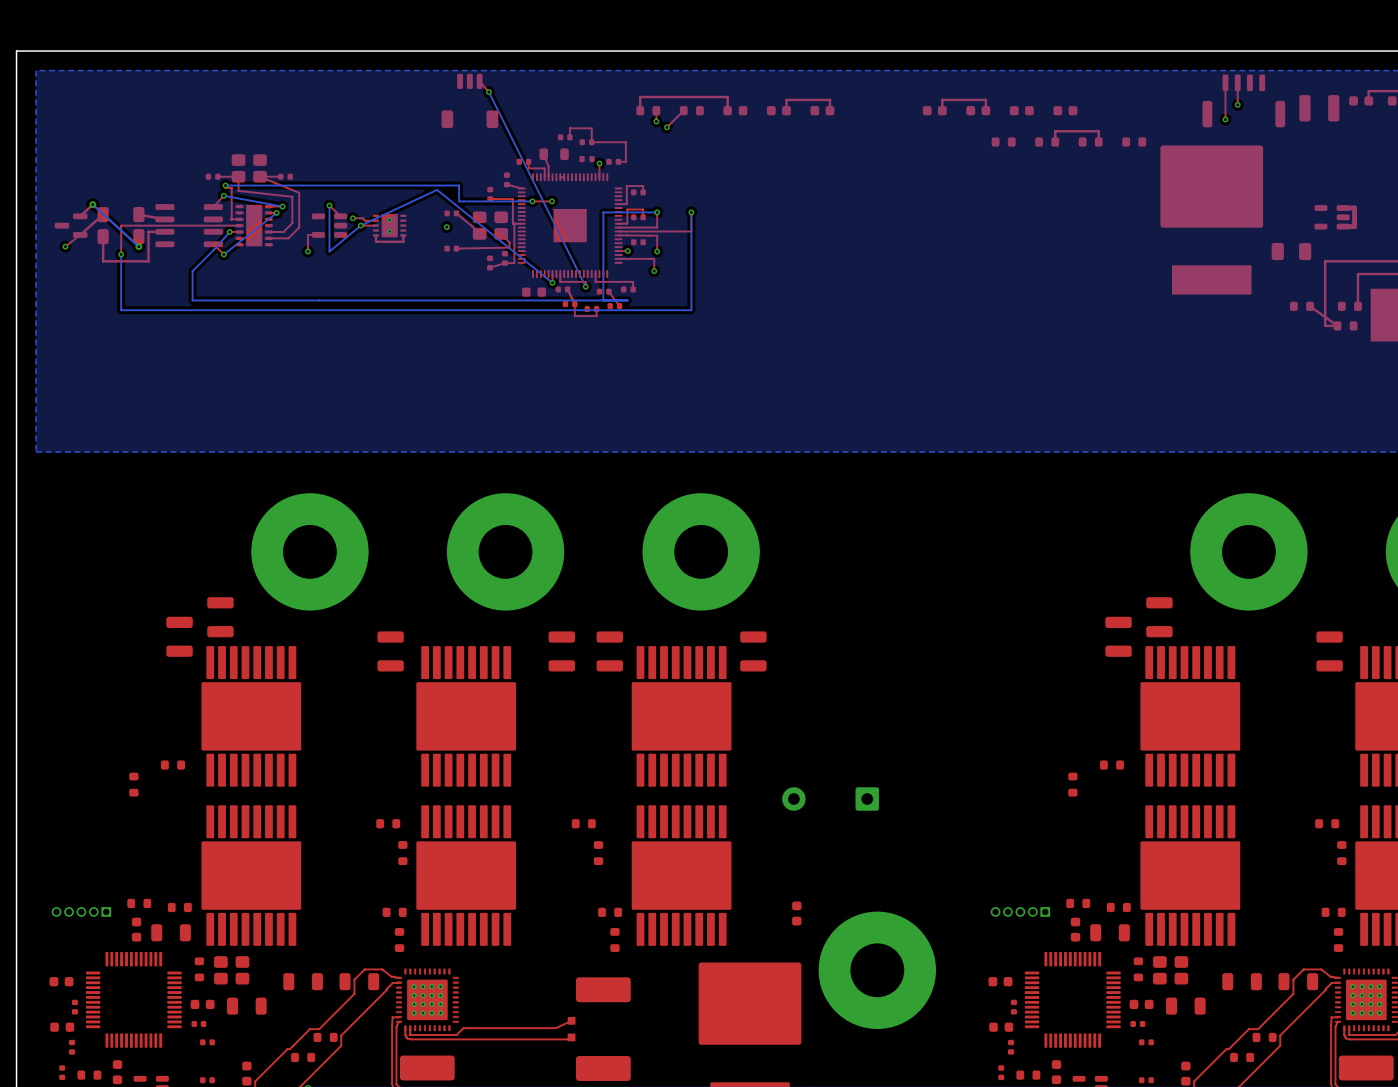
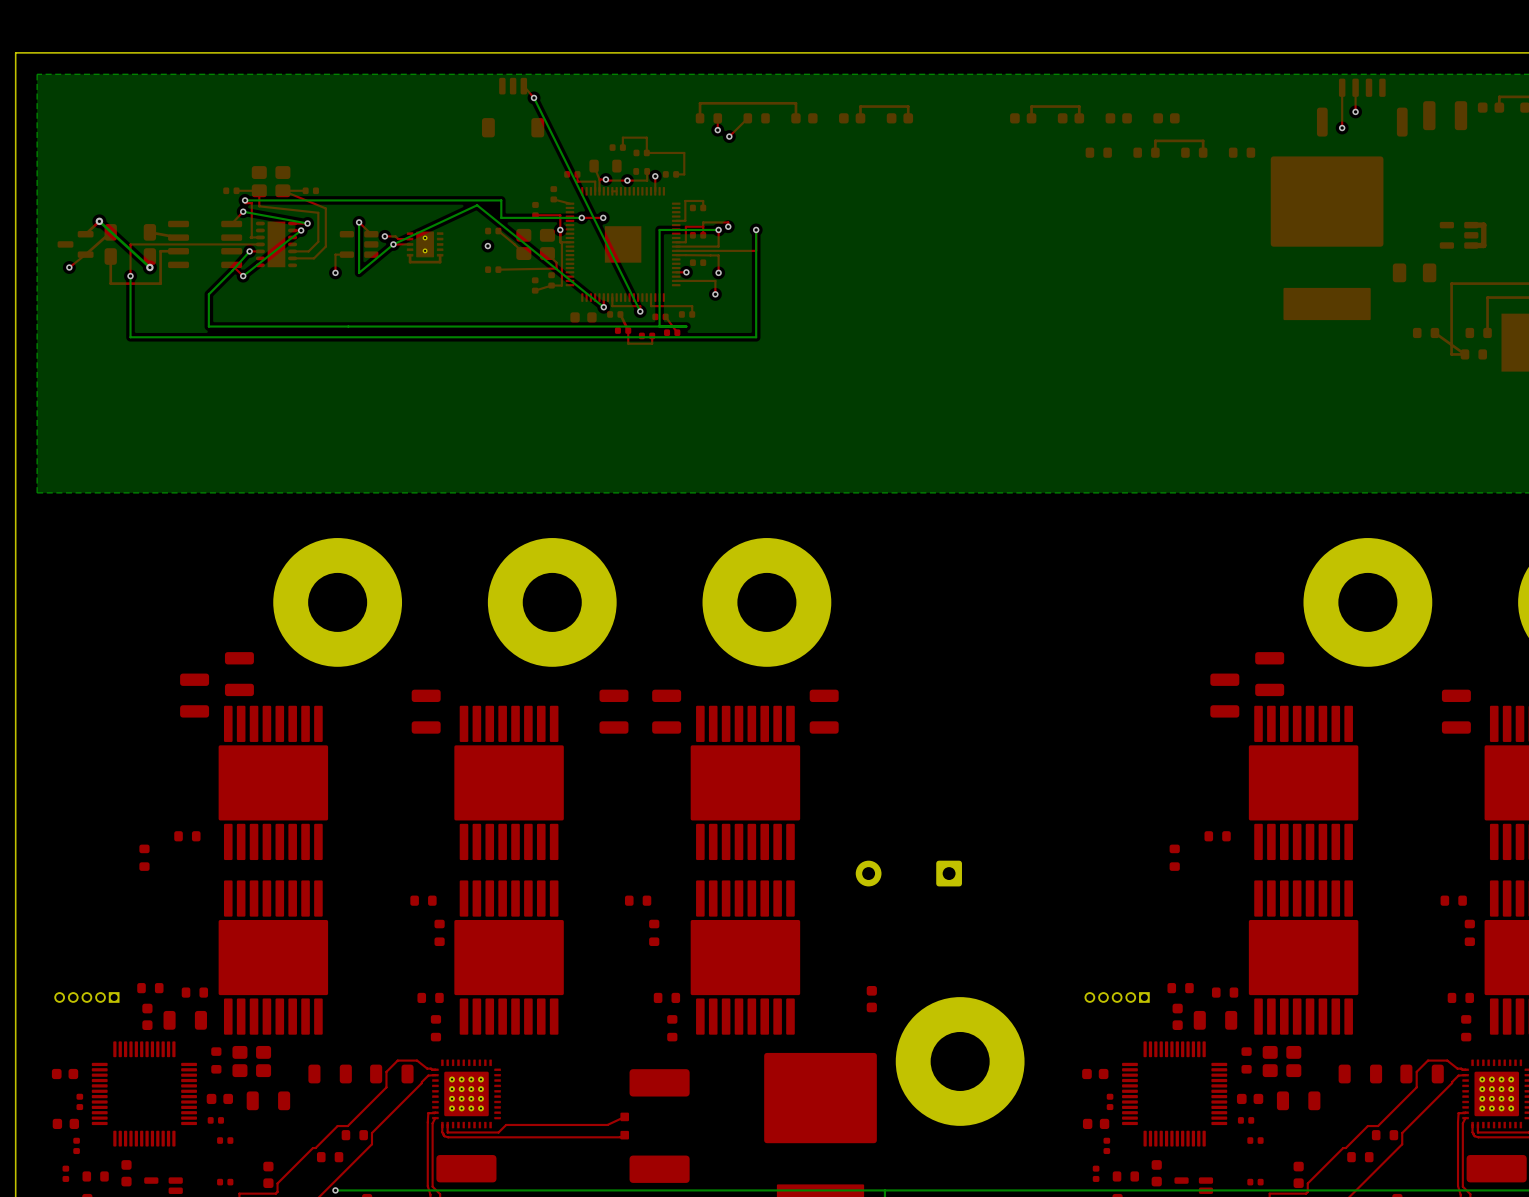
top track: none -> (647, 171) (647, 180) (599, 179)
via: none -> (605, 179)
via: none -> (627, 180)
top track: none -> (728, 226) (728, 222) (703, 222) (703, 226)
via: none -> (728, 226)
via: none -> (560, 229)

